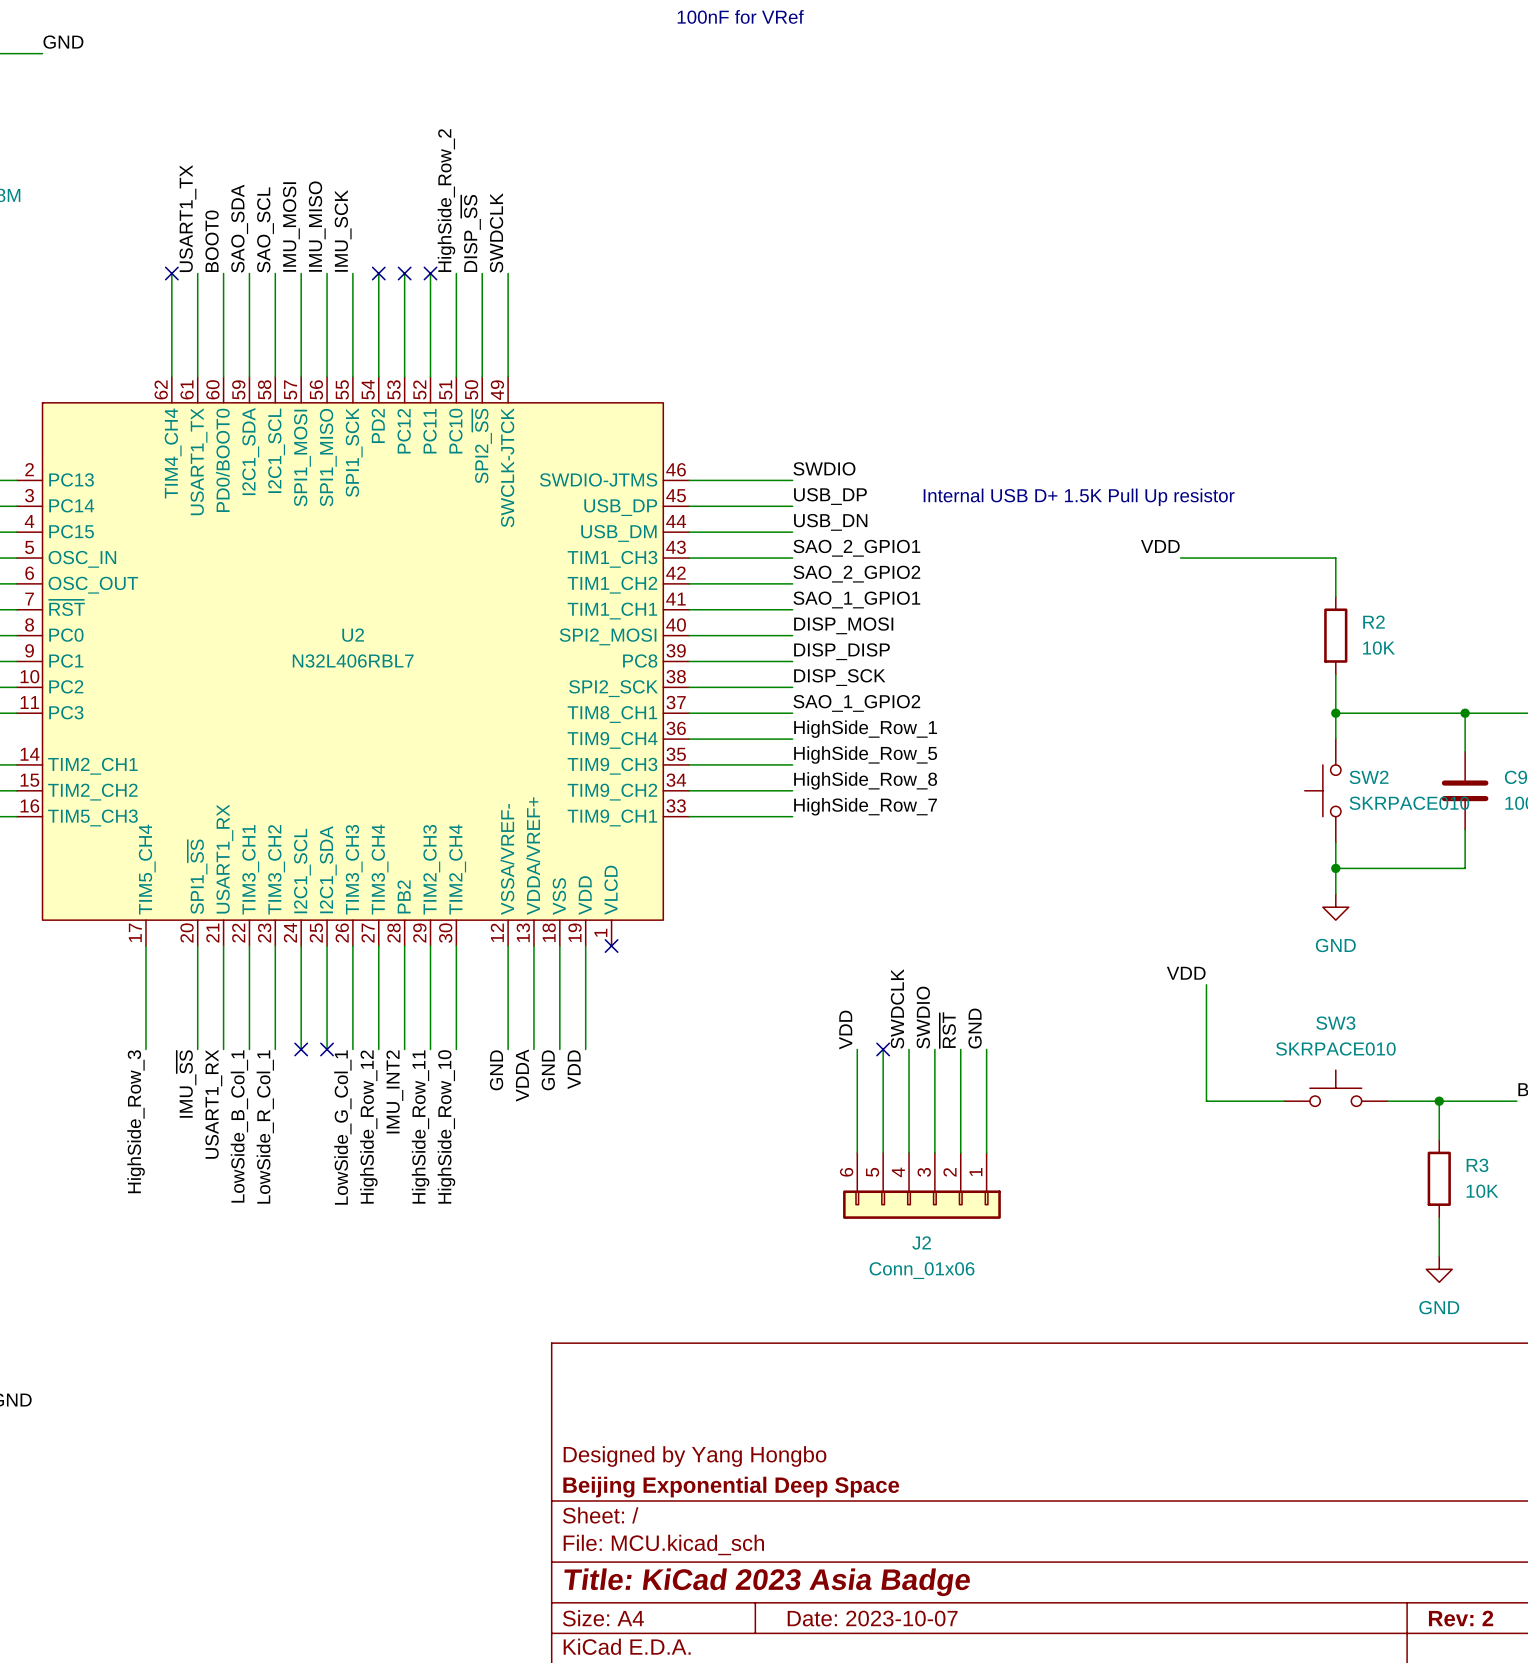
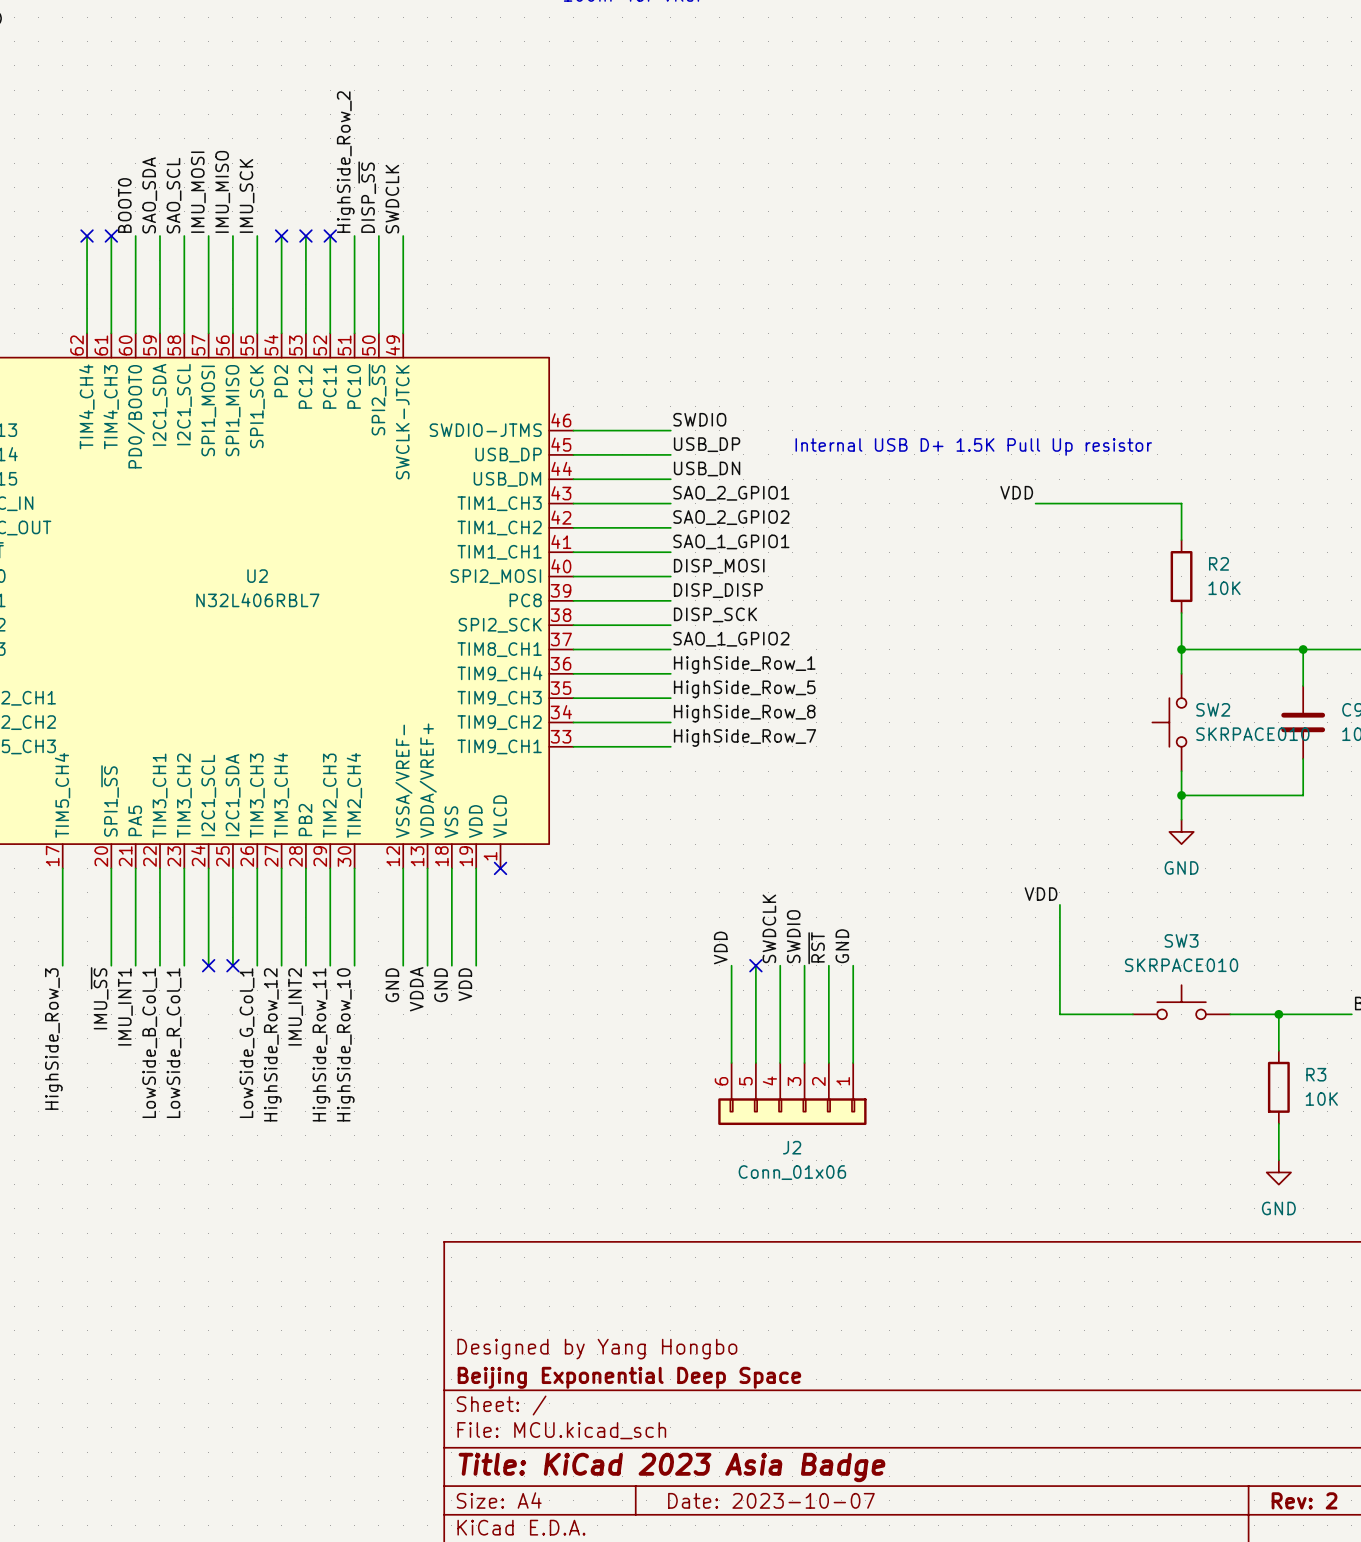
label: USART1_TX (187, 218) -> none
no-connect mark: none -> (111, 236)
U2 pin name: USART1_TX (199, 461) -> TIM4_CH3 (111, 407)
U2 pin name: USART1_RX (224, 859) -> PA5 (135, 820)
label: USART1_RX (213, 1104) -> IMU_INT1 (125, 1006)

